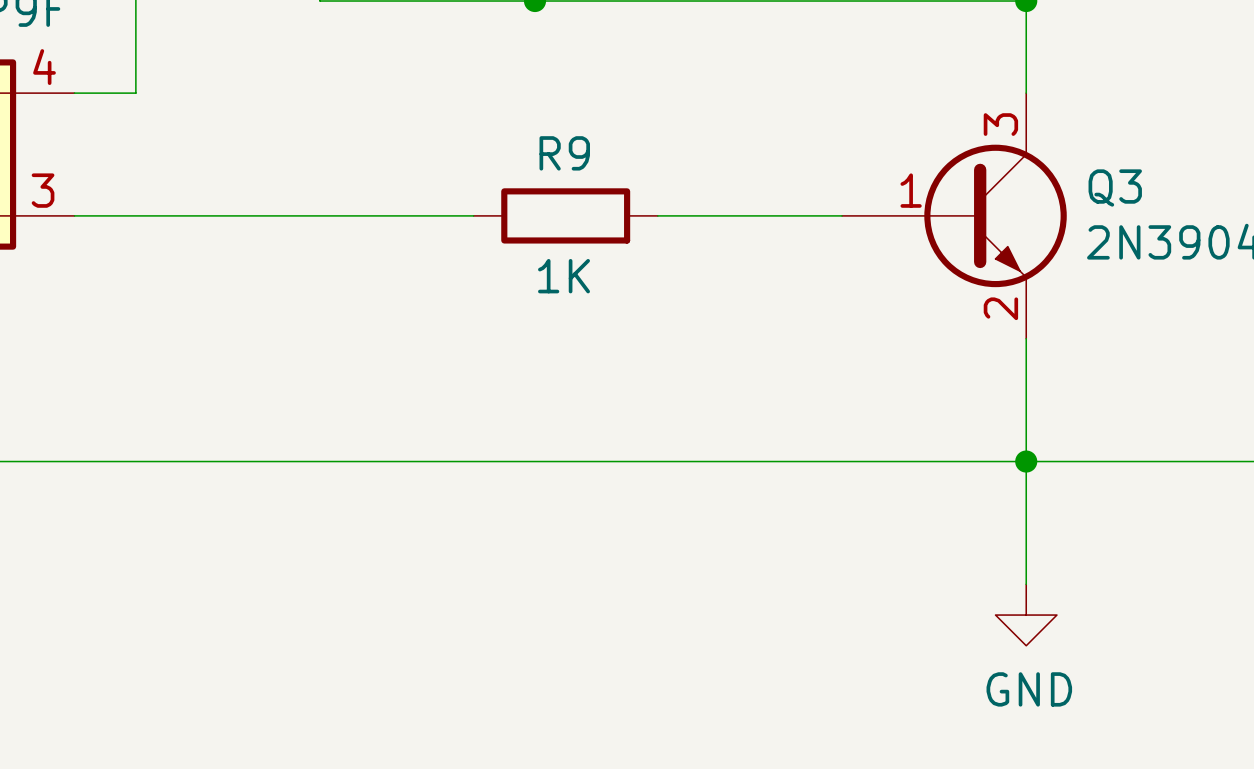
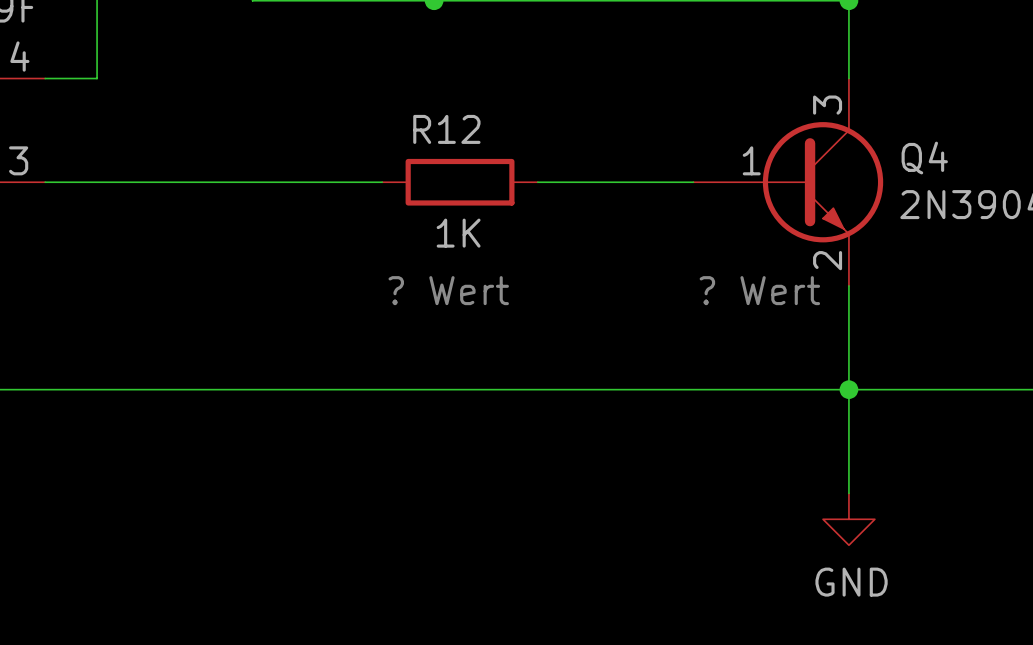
R9 name: R9 (564, 153) -> R12 (446, 129)
Q3 name: Q3 (1115, 187) -> Q4 (924, 158)
text: none -> ? Wert (448, 290)
text: none -> ? Wert (759, 290)

